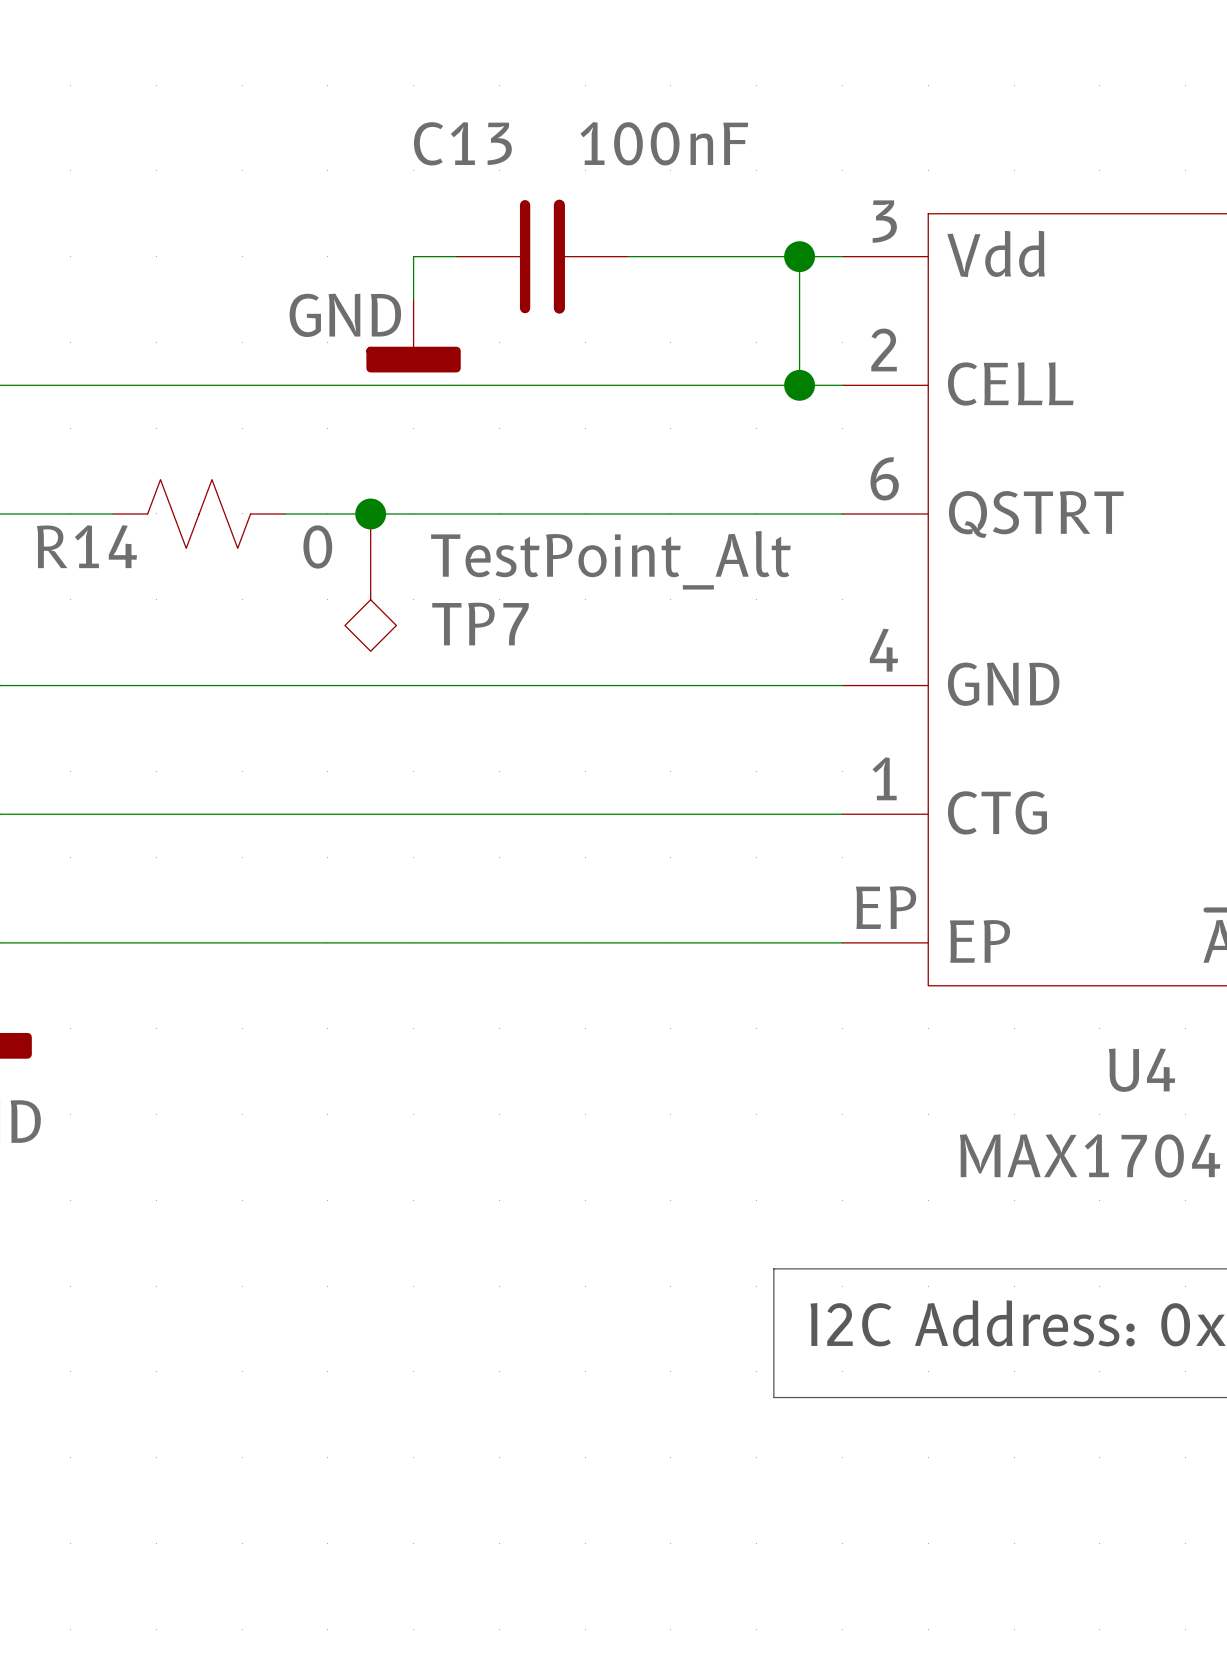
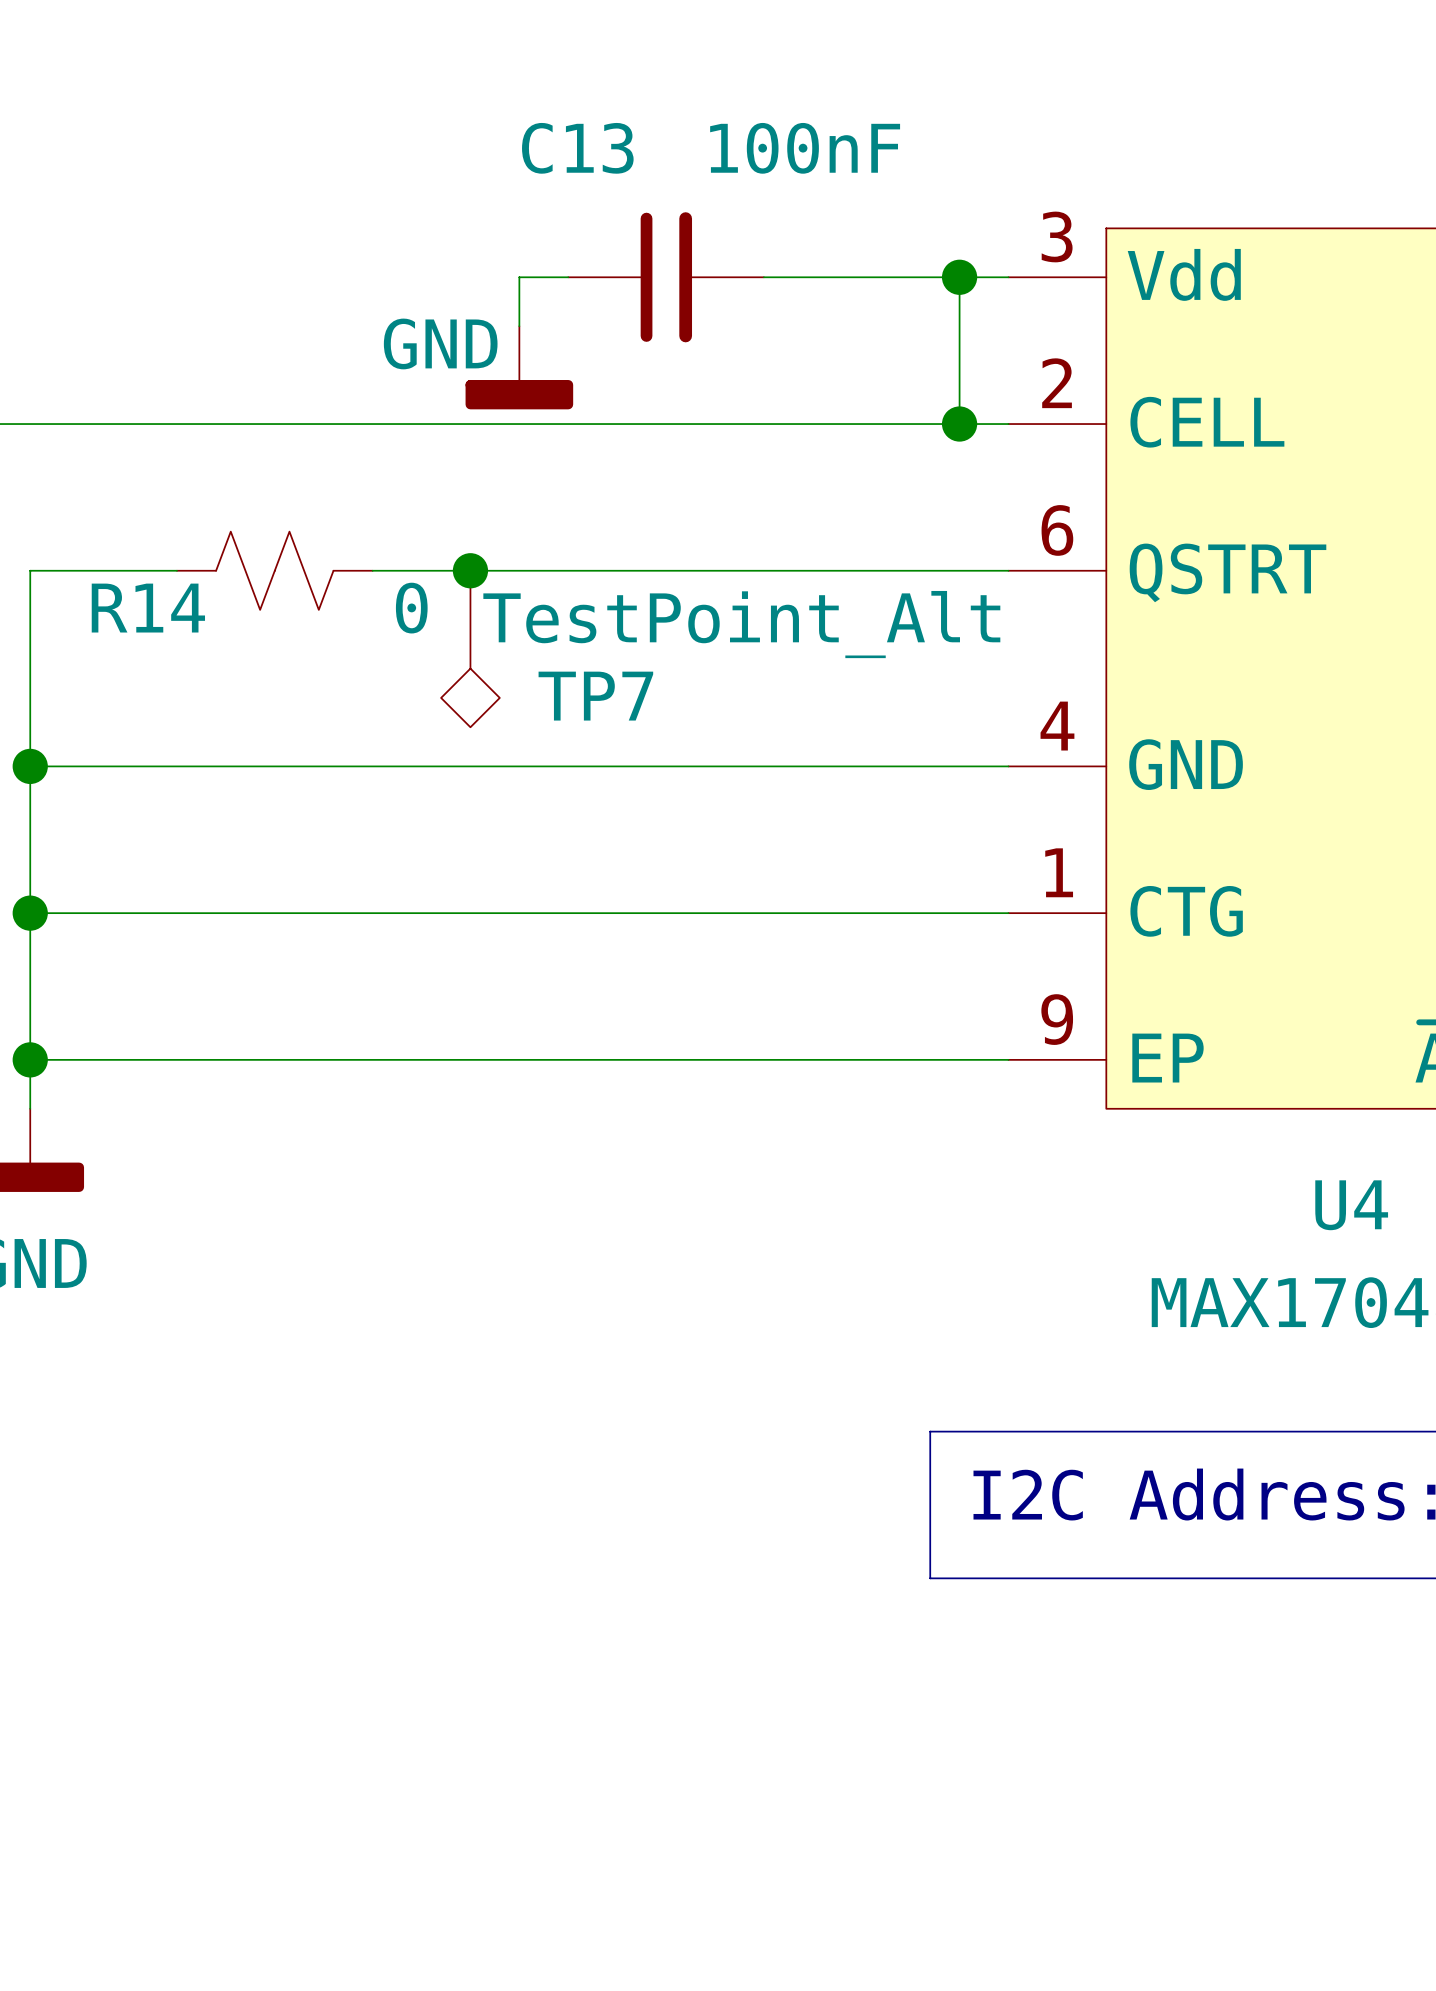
U4 pin number: EP (886, 907) -> 9 (1057, 1019)

